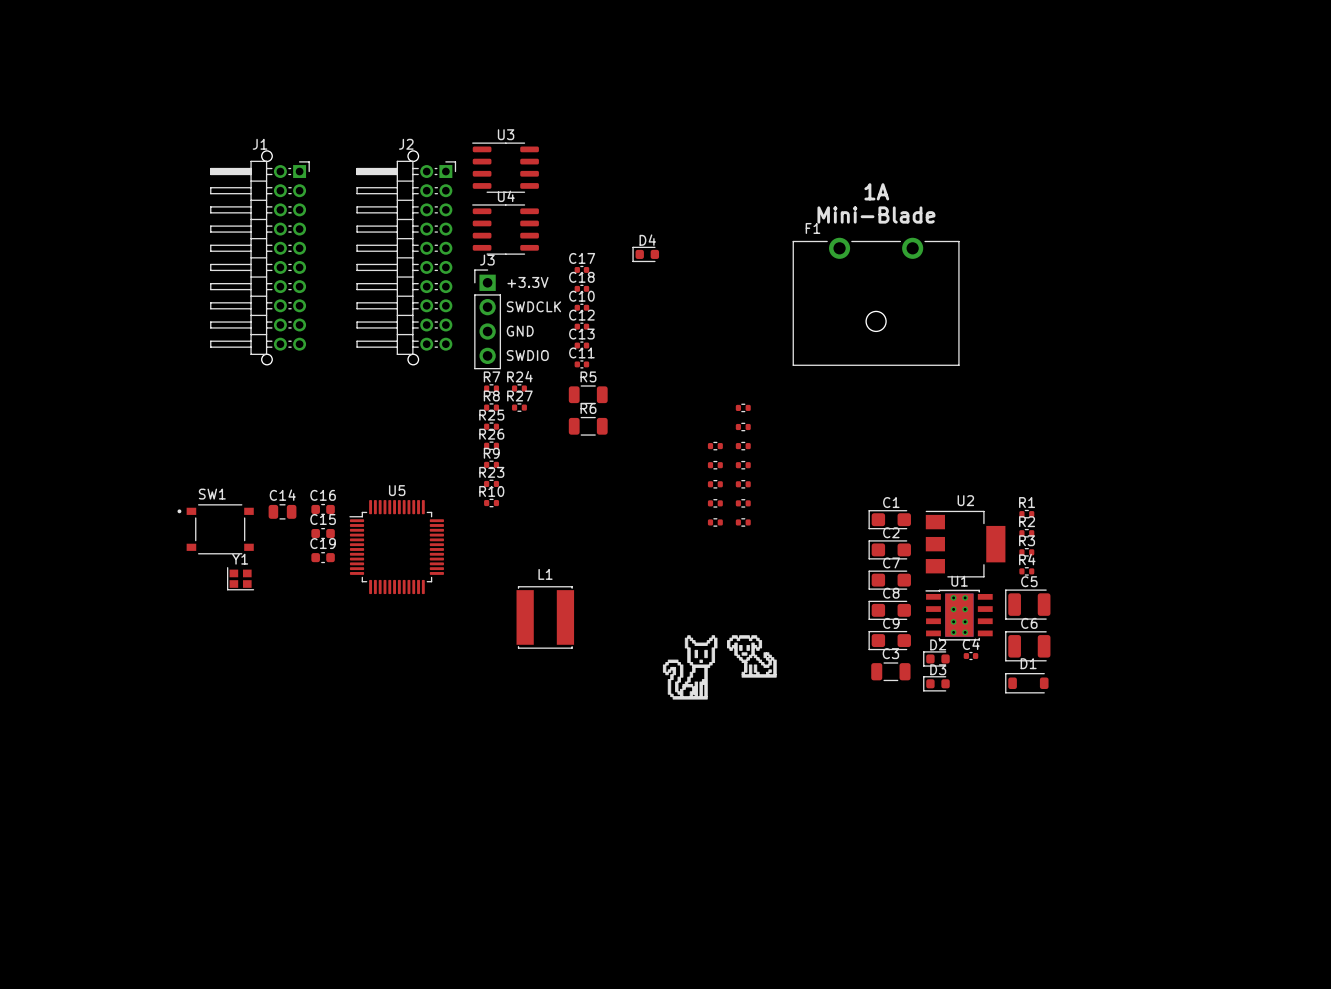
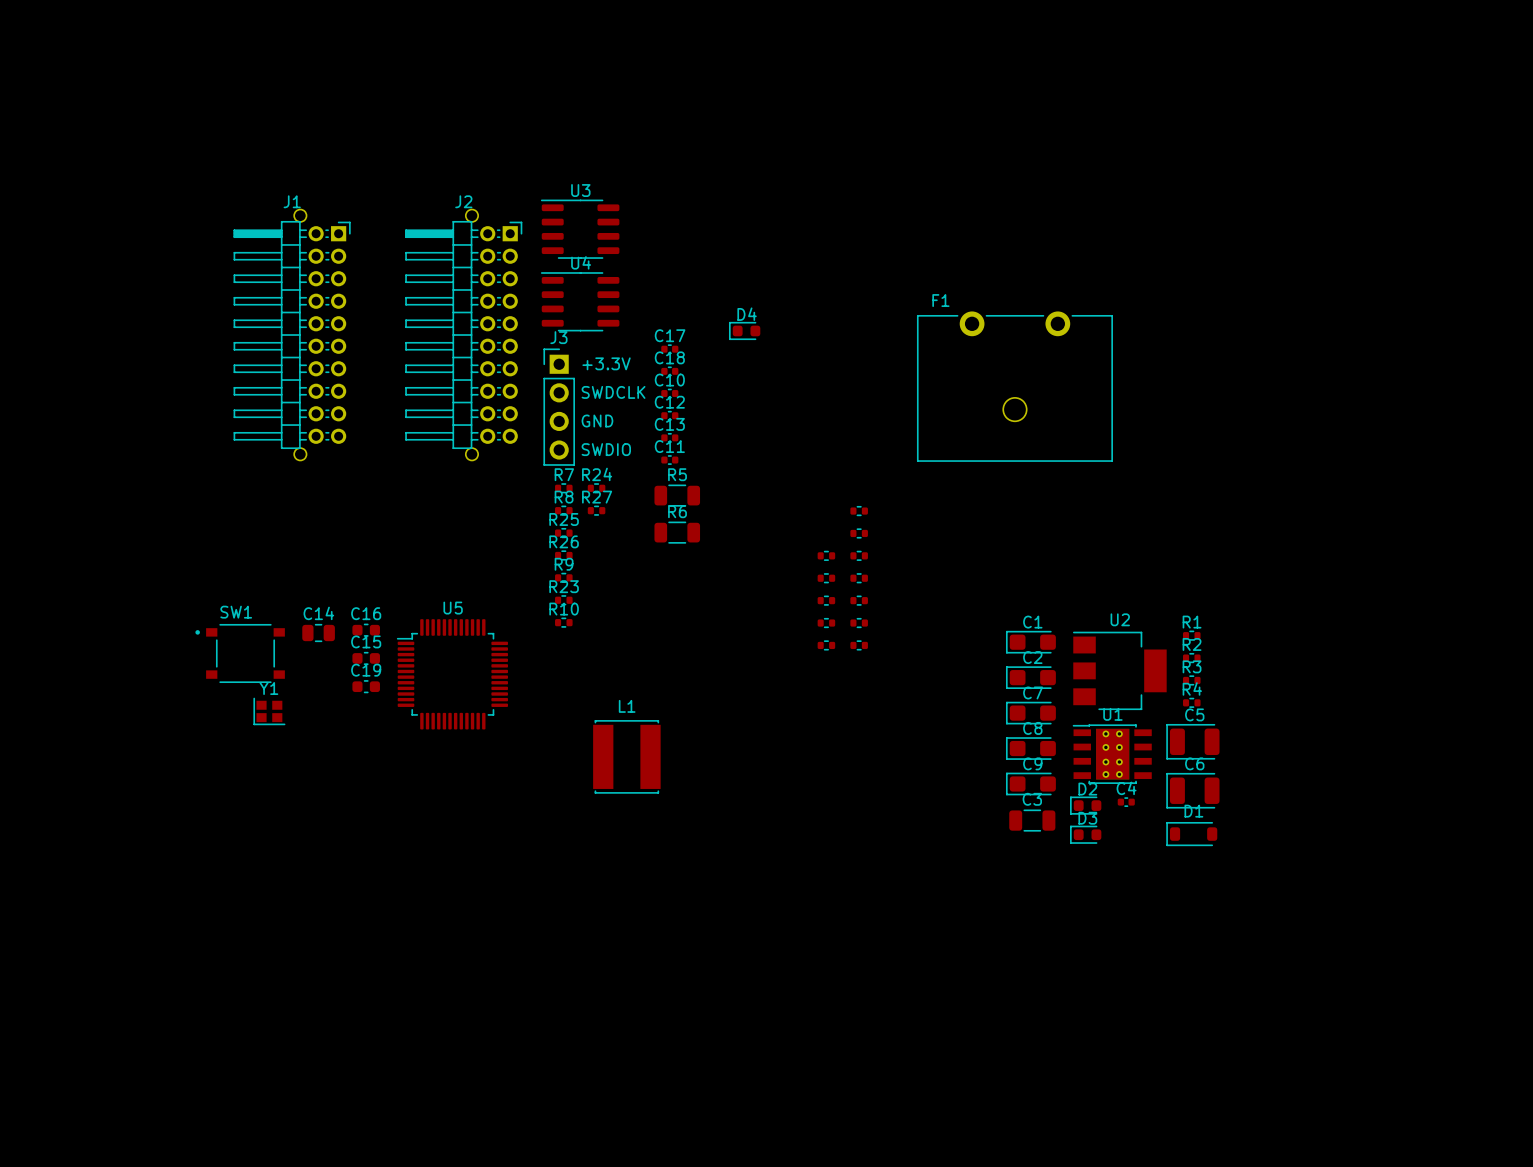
text: 1A (876, 191) -> none
text: Mini-Blade (876, 215) -> none
drawing: [662, 635, 777, 700] -> none

